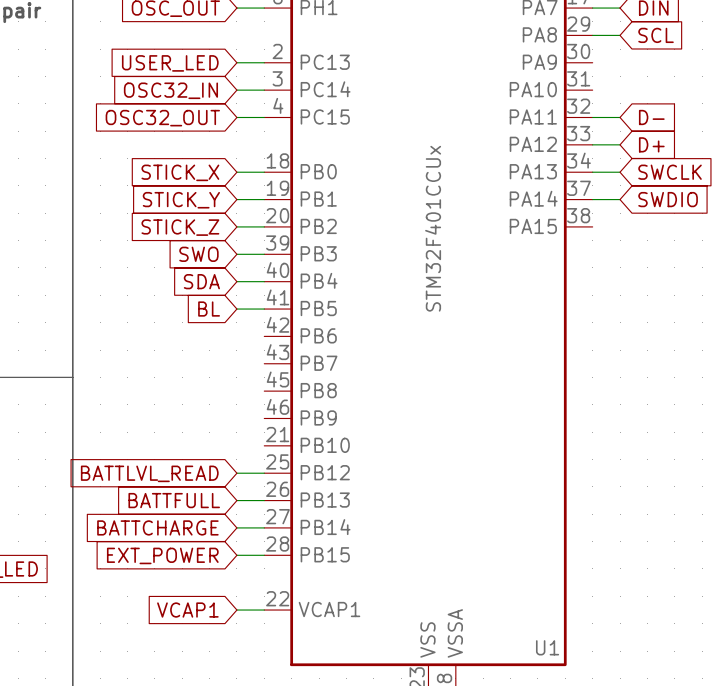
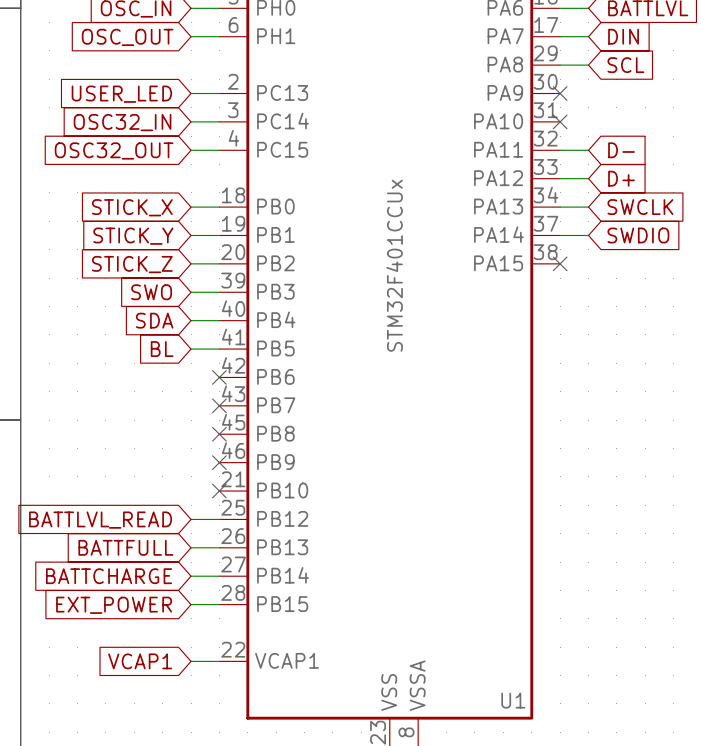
no-connect mark: none -> (560, 93)
no-connect mark: none -> (560, 121)
no-connect mark: none -> (560, 263)
no-connect mark: none -> (219, 377)
no-connect mark: none -> (219, 405)
no-connect mark: none -> (219, 434)
no-connect mark: none -> (219, 462)
no-connect mark: none -> (219, 491)

